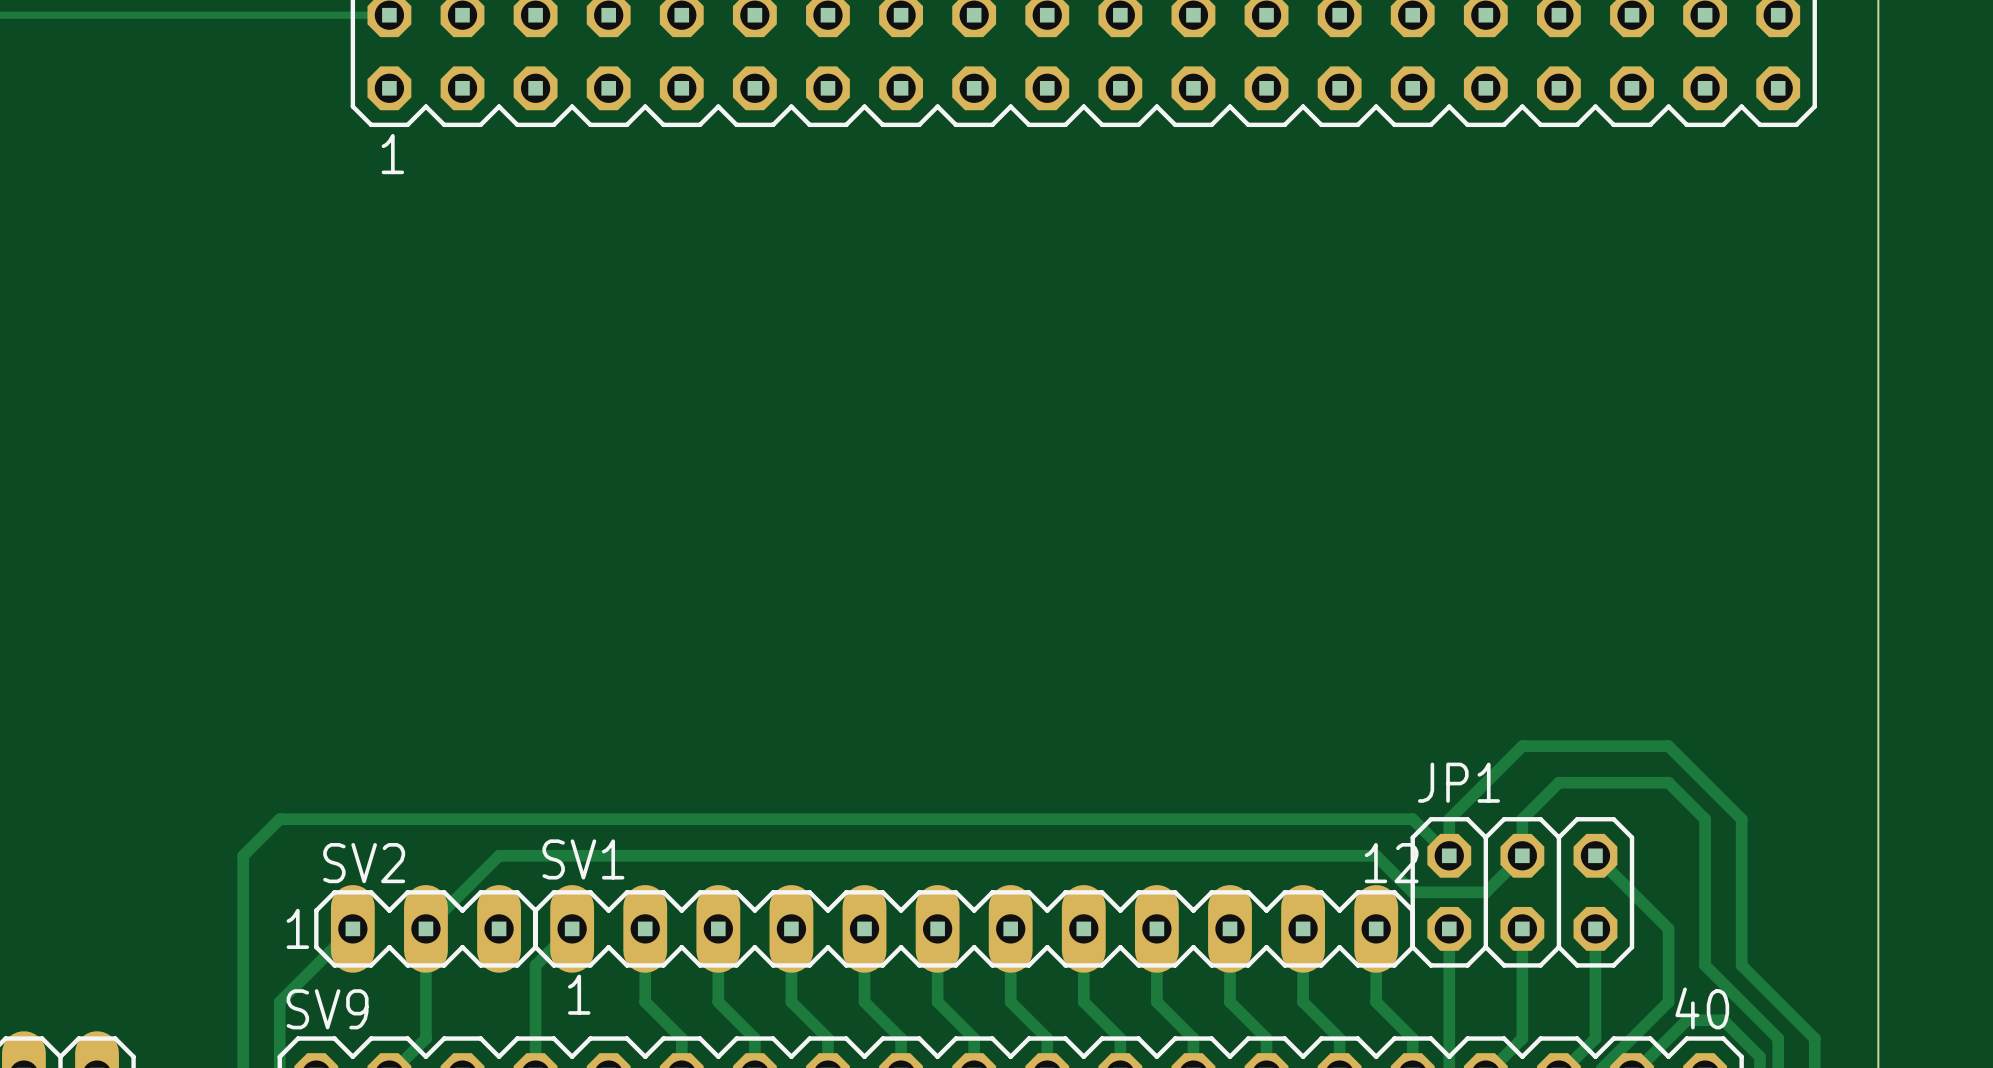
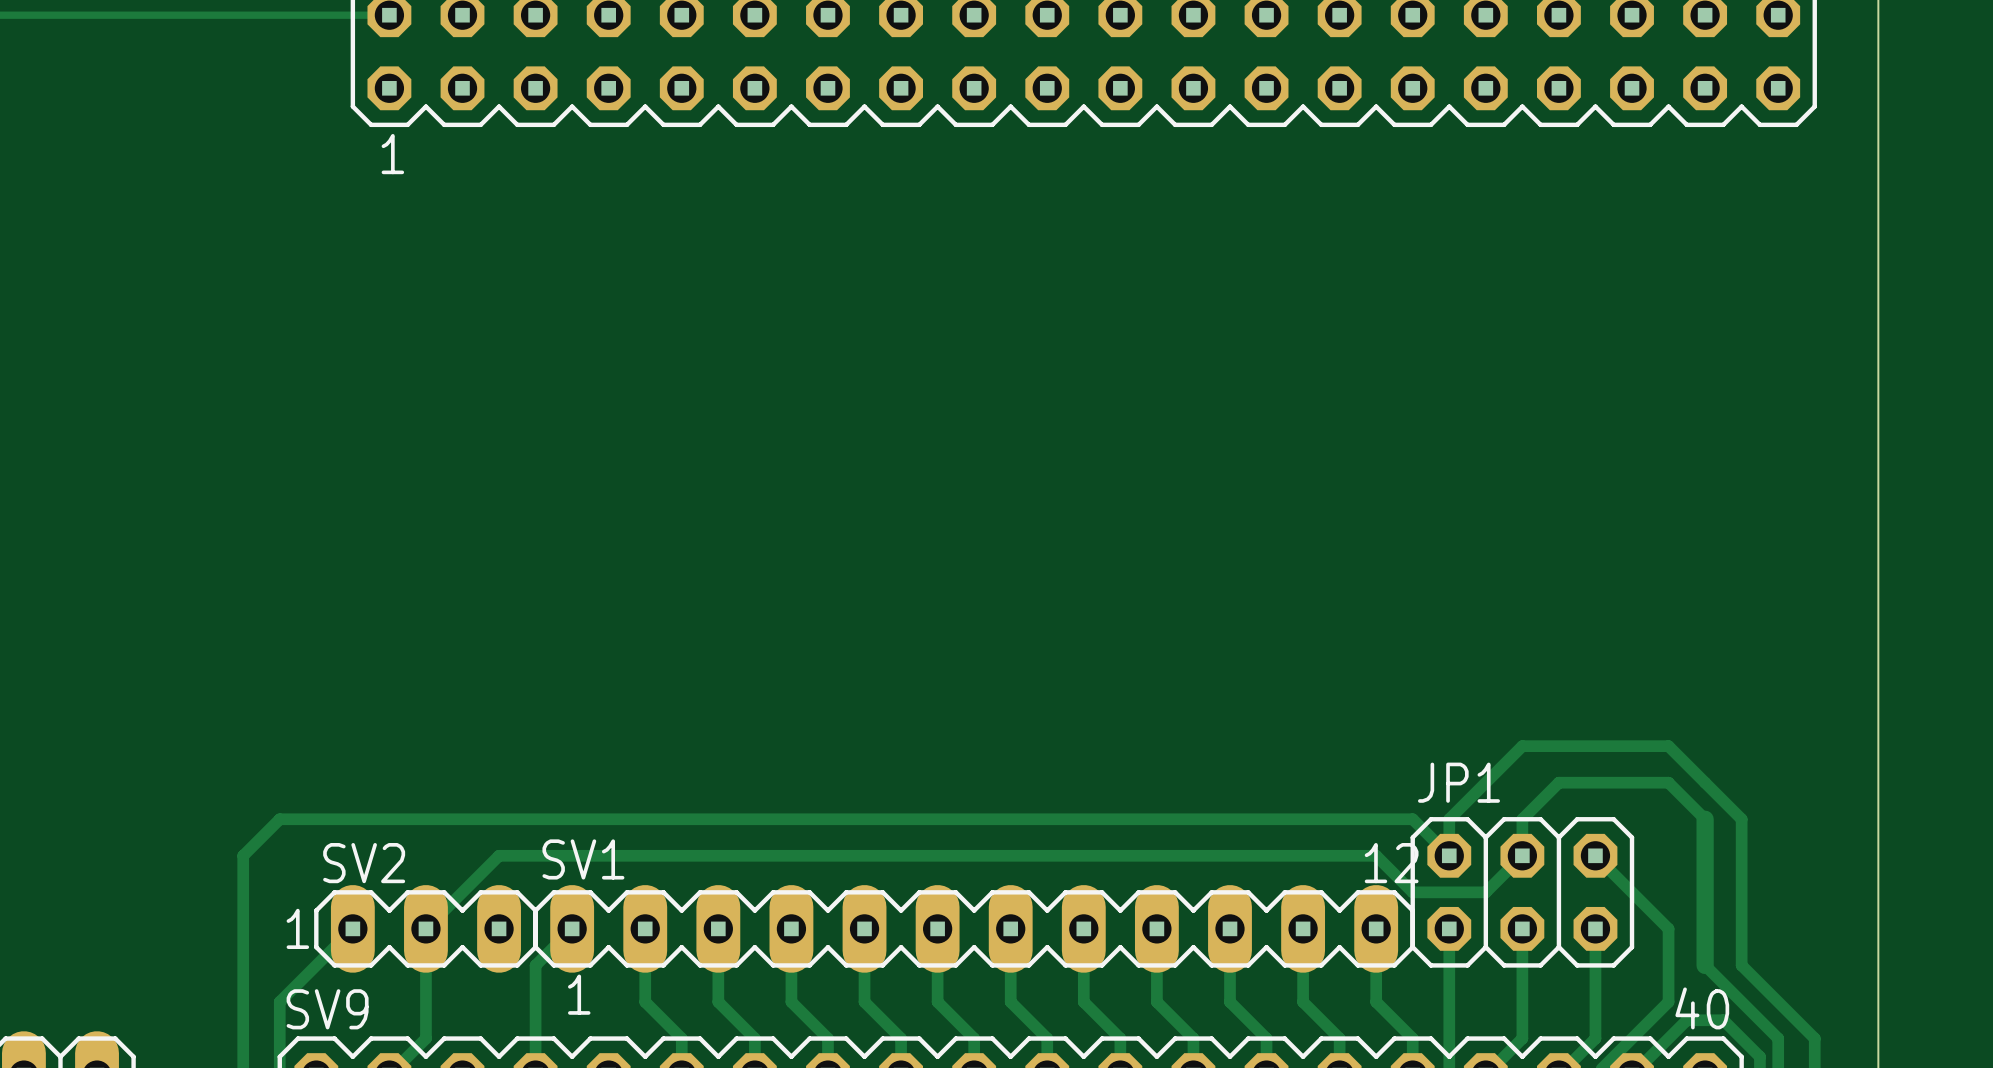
track width: thin (1705, 819) (1705, 965) -> thick (1705, 819) (1705, 965)

